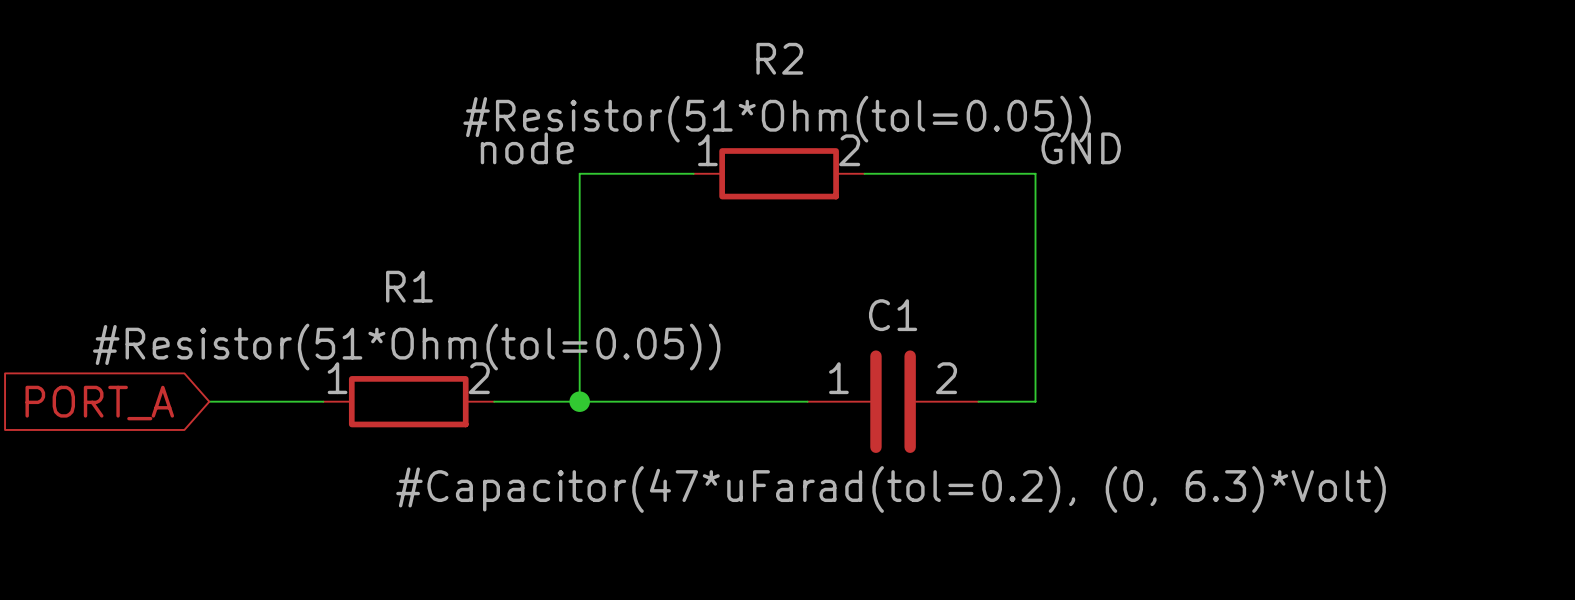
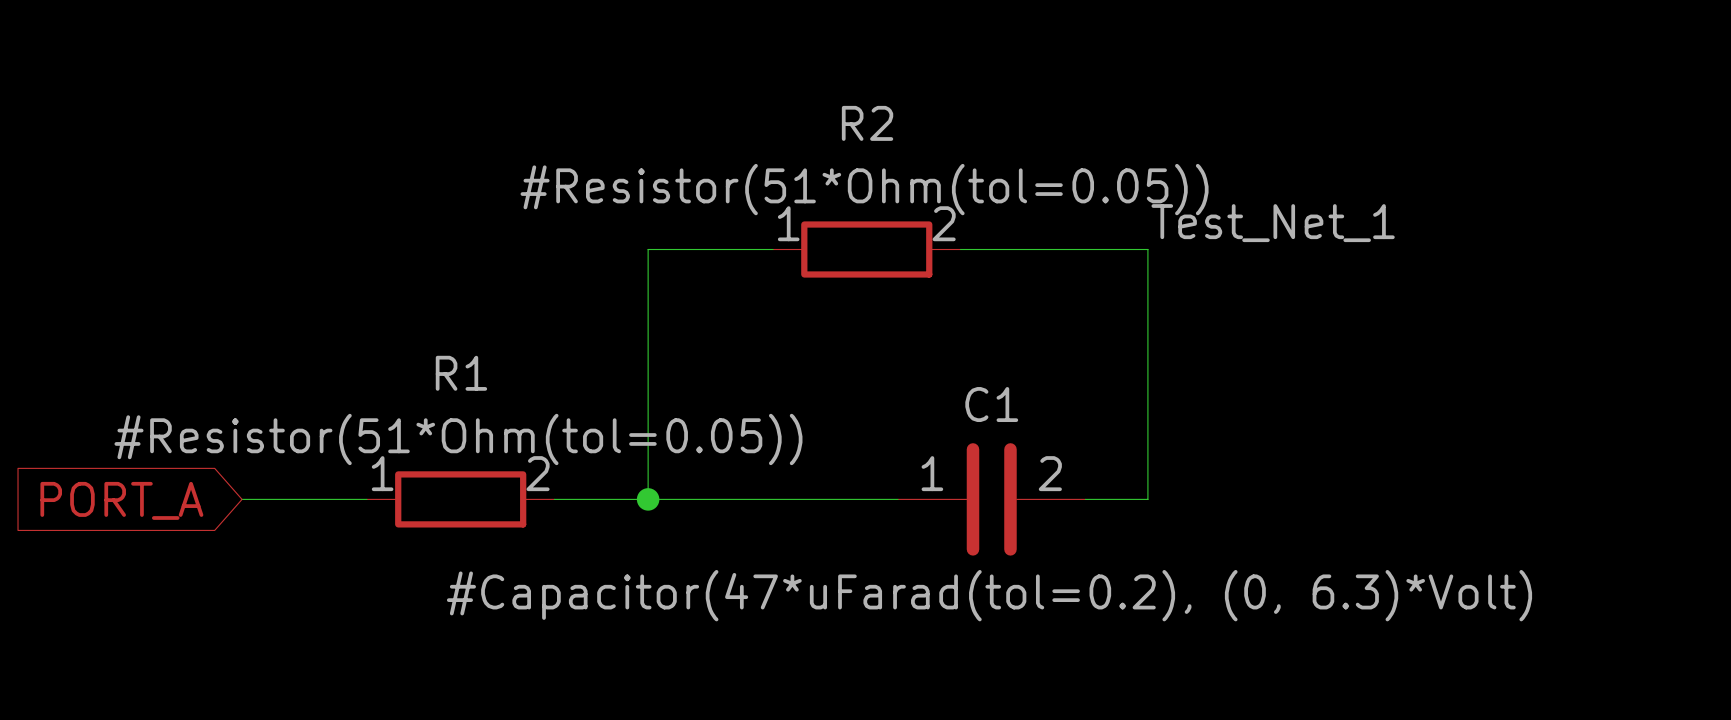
label: node (527, 148) -> none
label: GND (1081, 148) -> Test_Net_1 (1273, 223)

